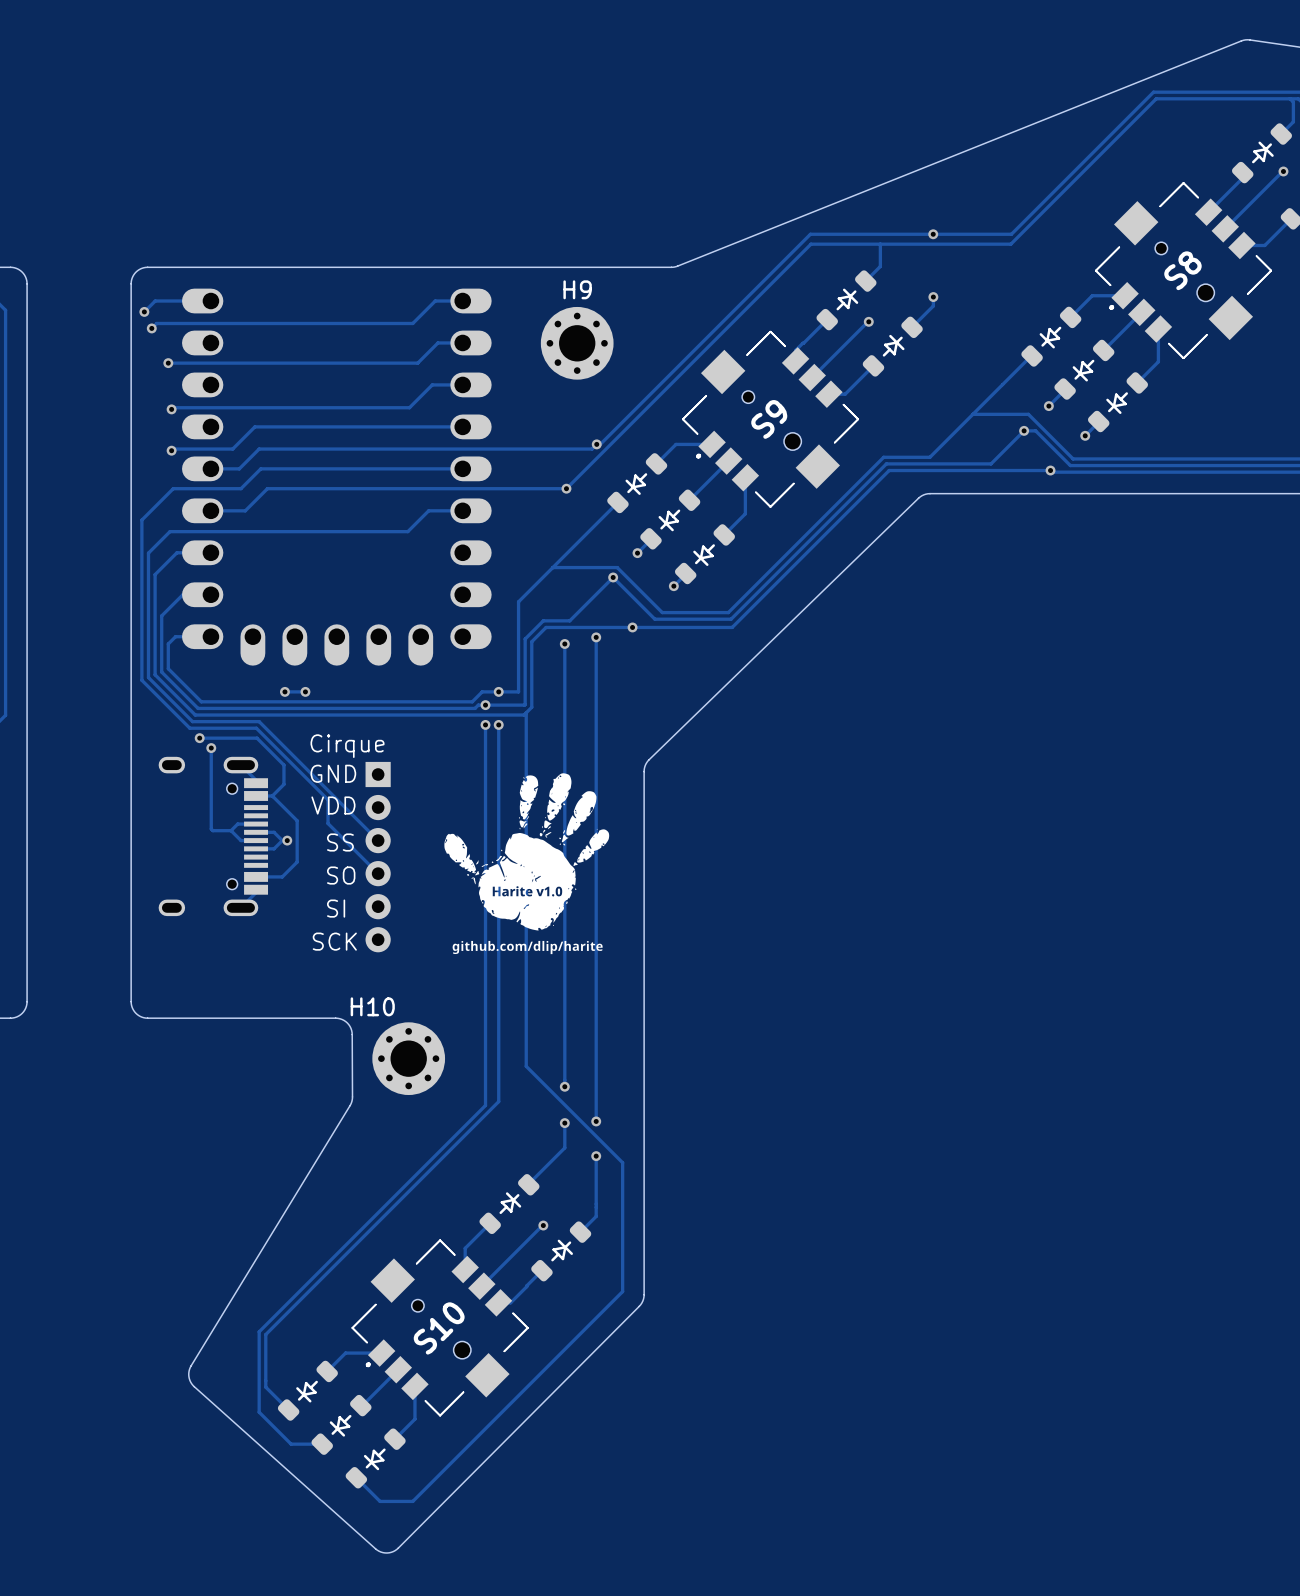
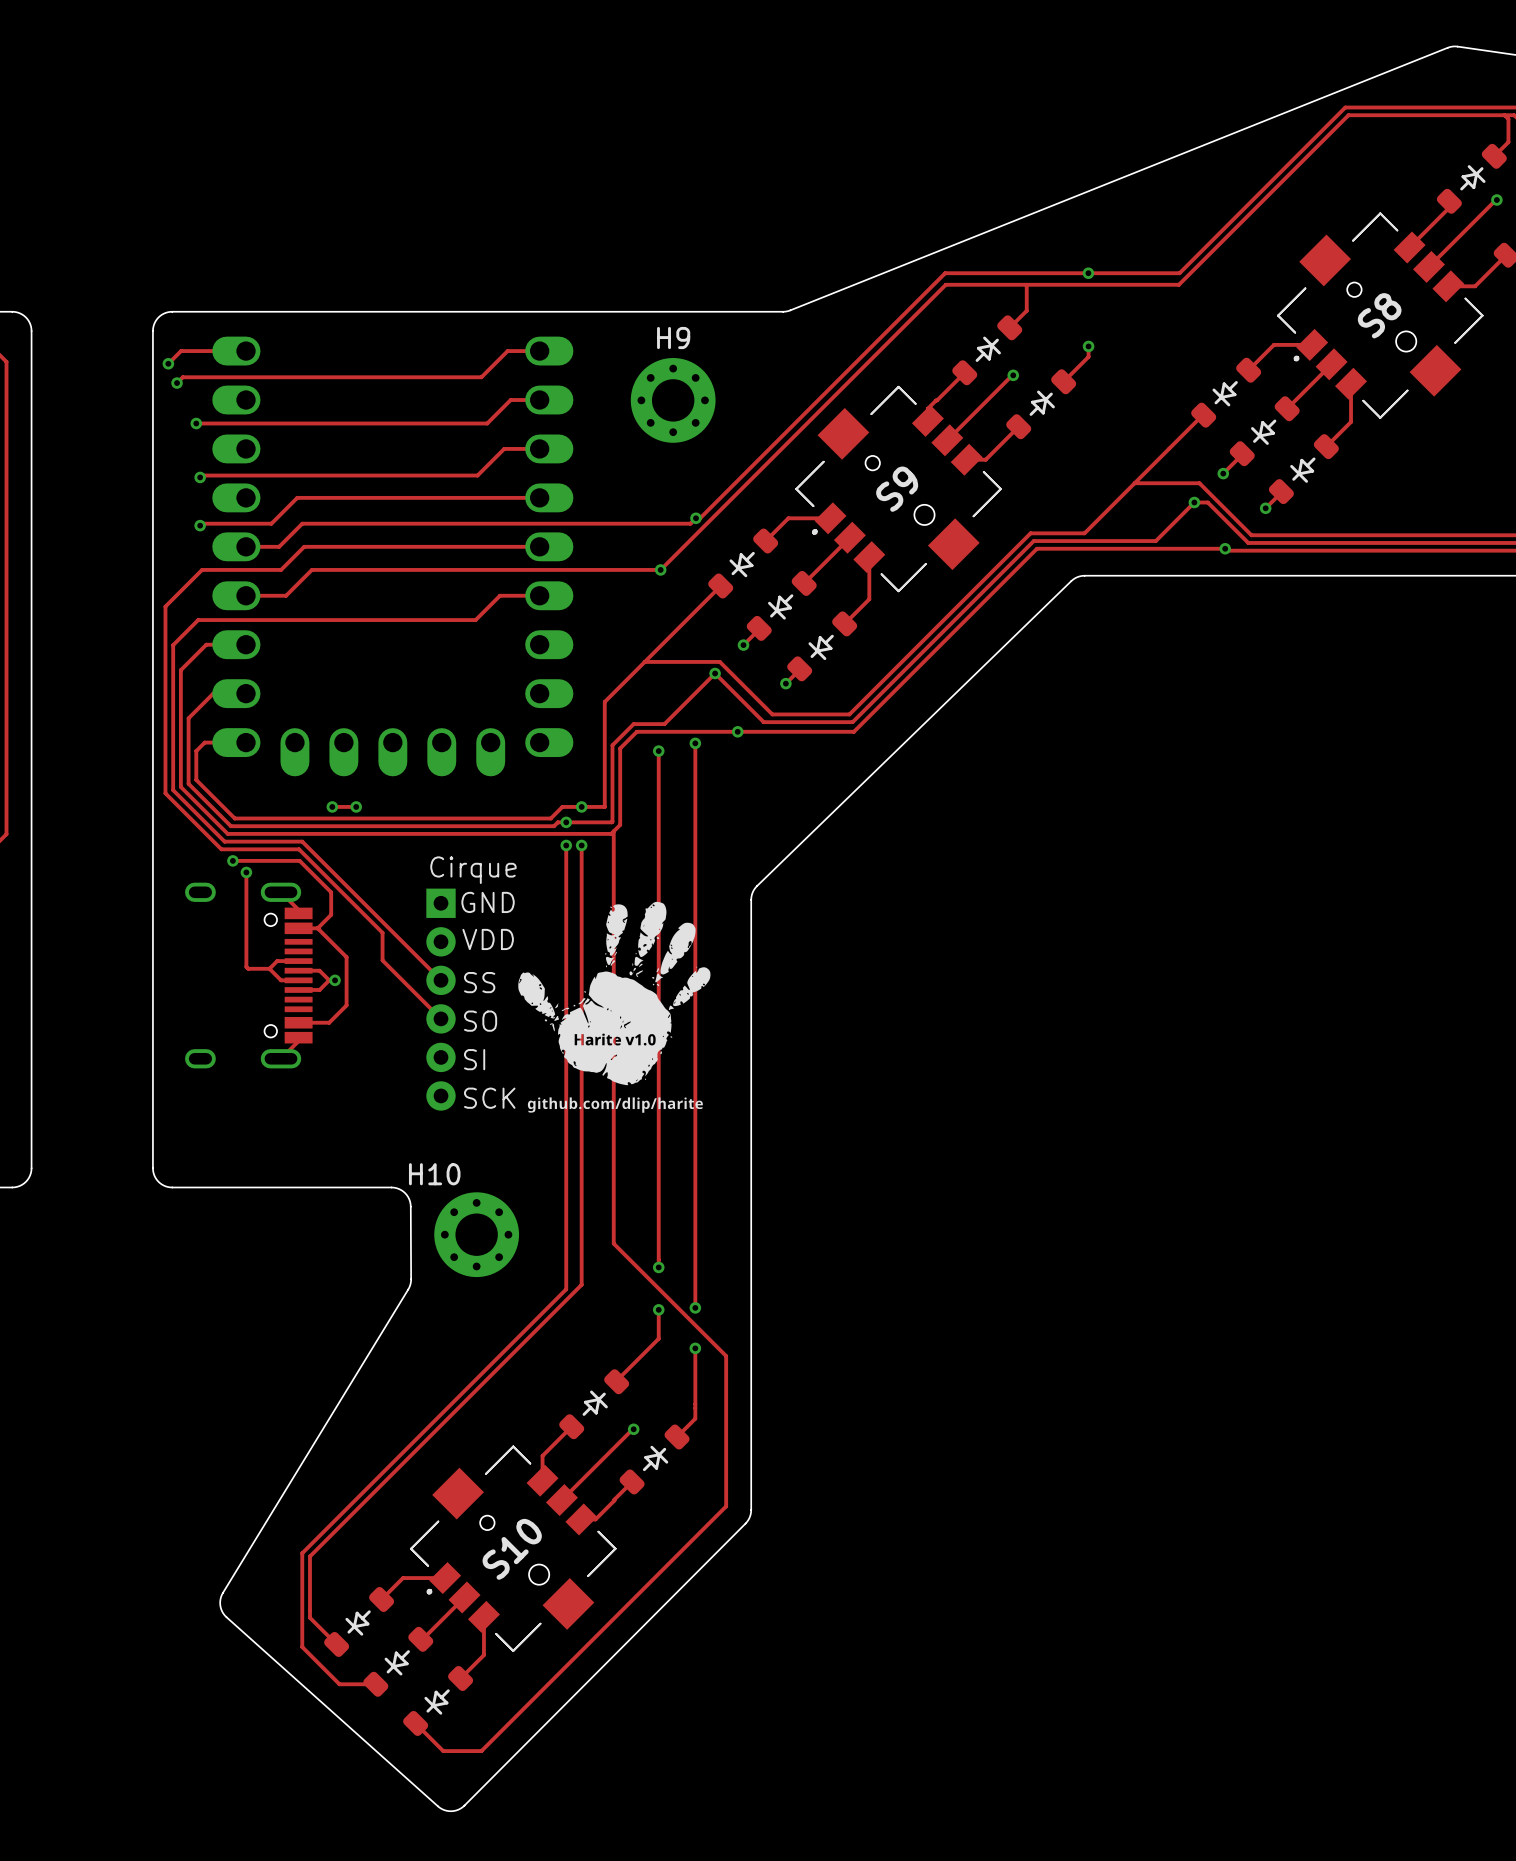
part text position: Cirque (347, 746) -> Cirque (473, 870)
part text position: GND (333, 773) -> GND (488, 902)
part text position: VDD (333, 805) -> VDD (488, 939)
part text position: SS (340, 842) -> SS (479, 982)
part text position: SO (341, 875) -> SO (480, 1021)
part text position: SI (336, 908) -> SI (474, 1059)
part text position: SCK (334, 941) -> SCK (489, 1098)

